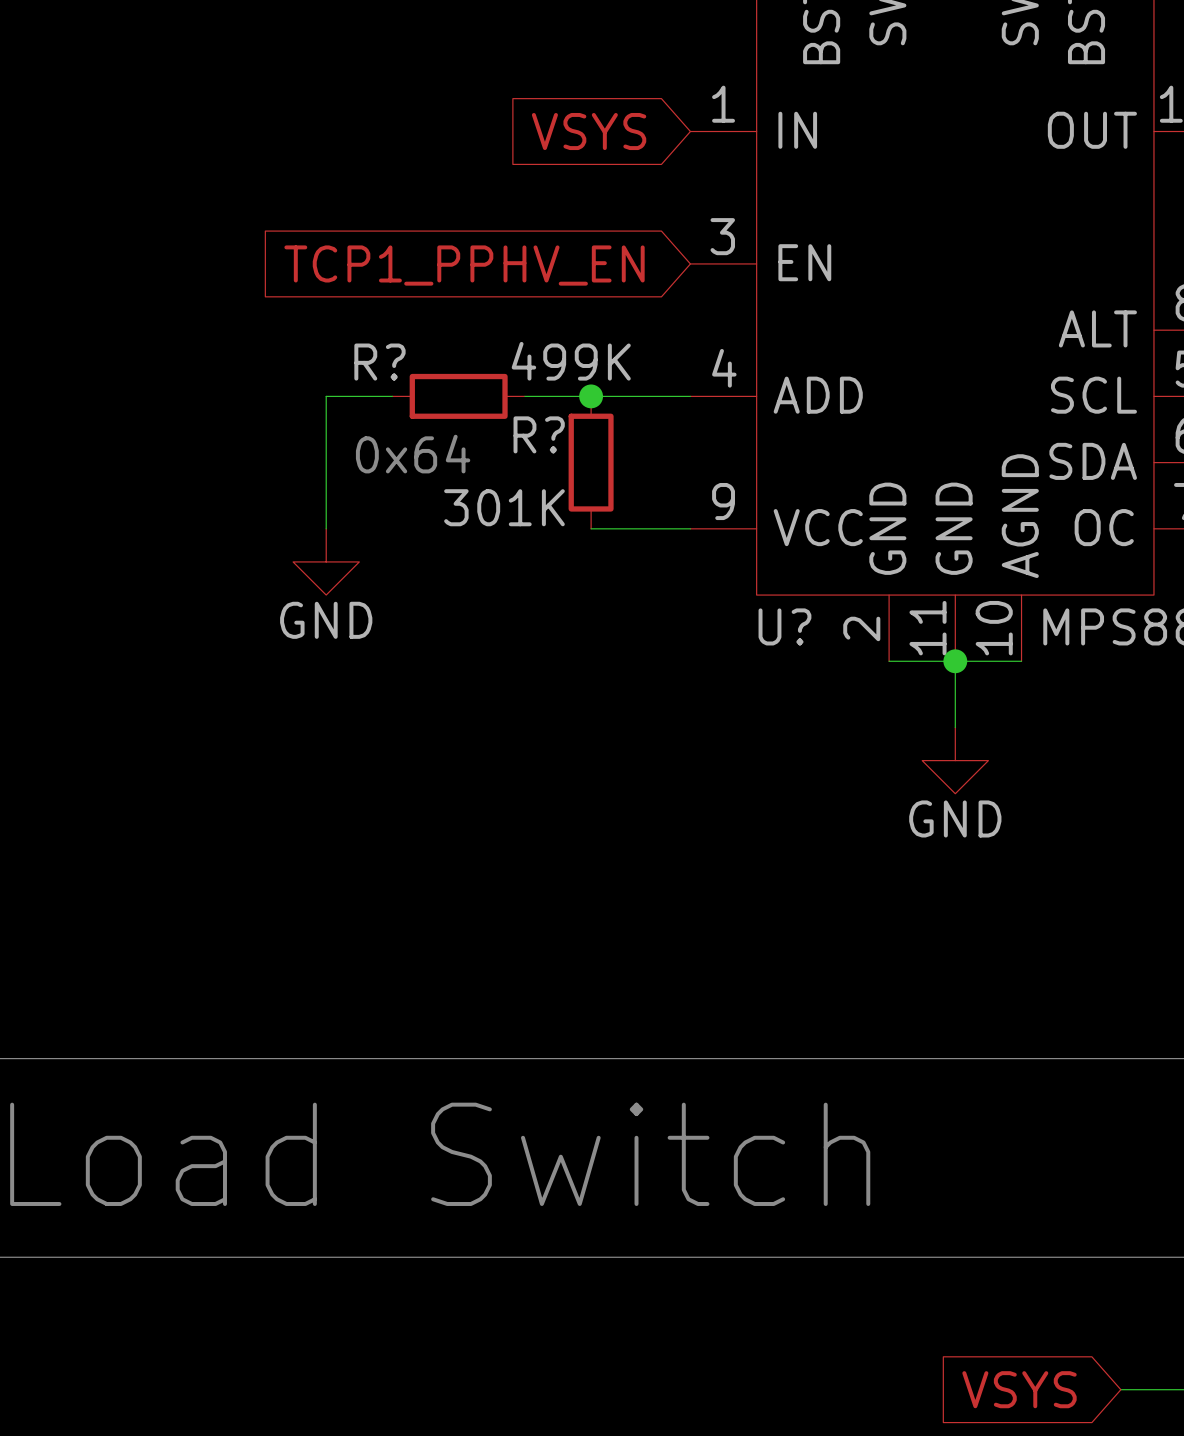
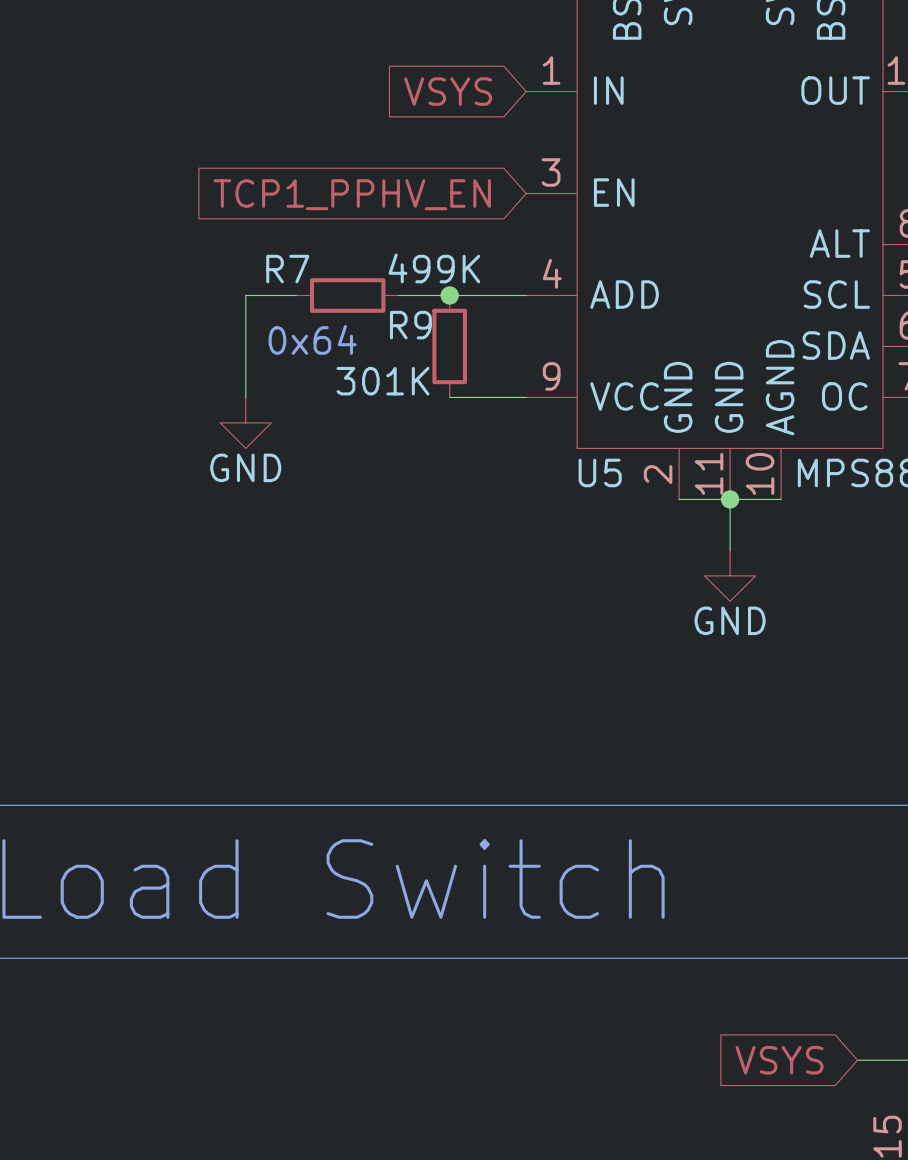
R? name: R? (379, 362) -> R7 (287, 269)
R? name: R? (539, 434) -> R9 (410, 325)
U? name: U? (784, 626) -> U5 (600, 472)

